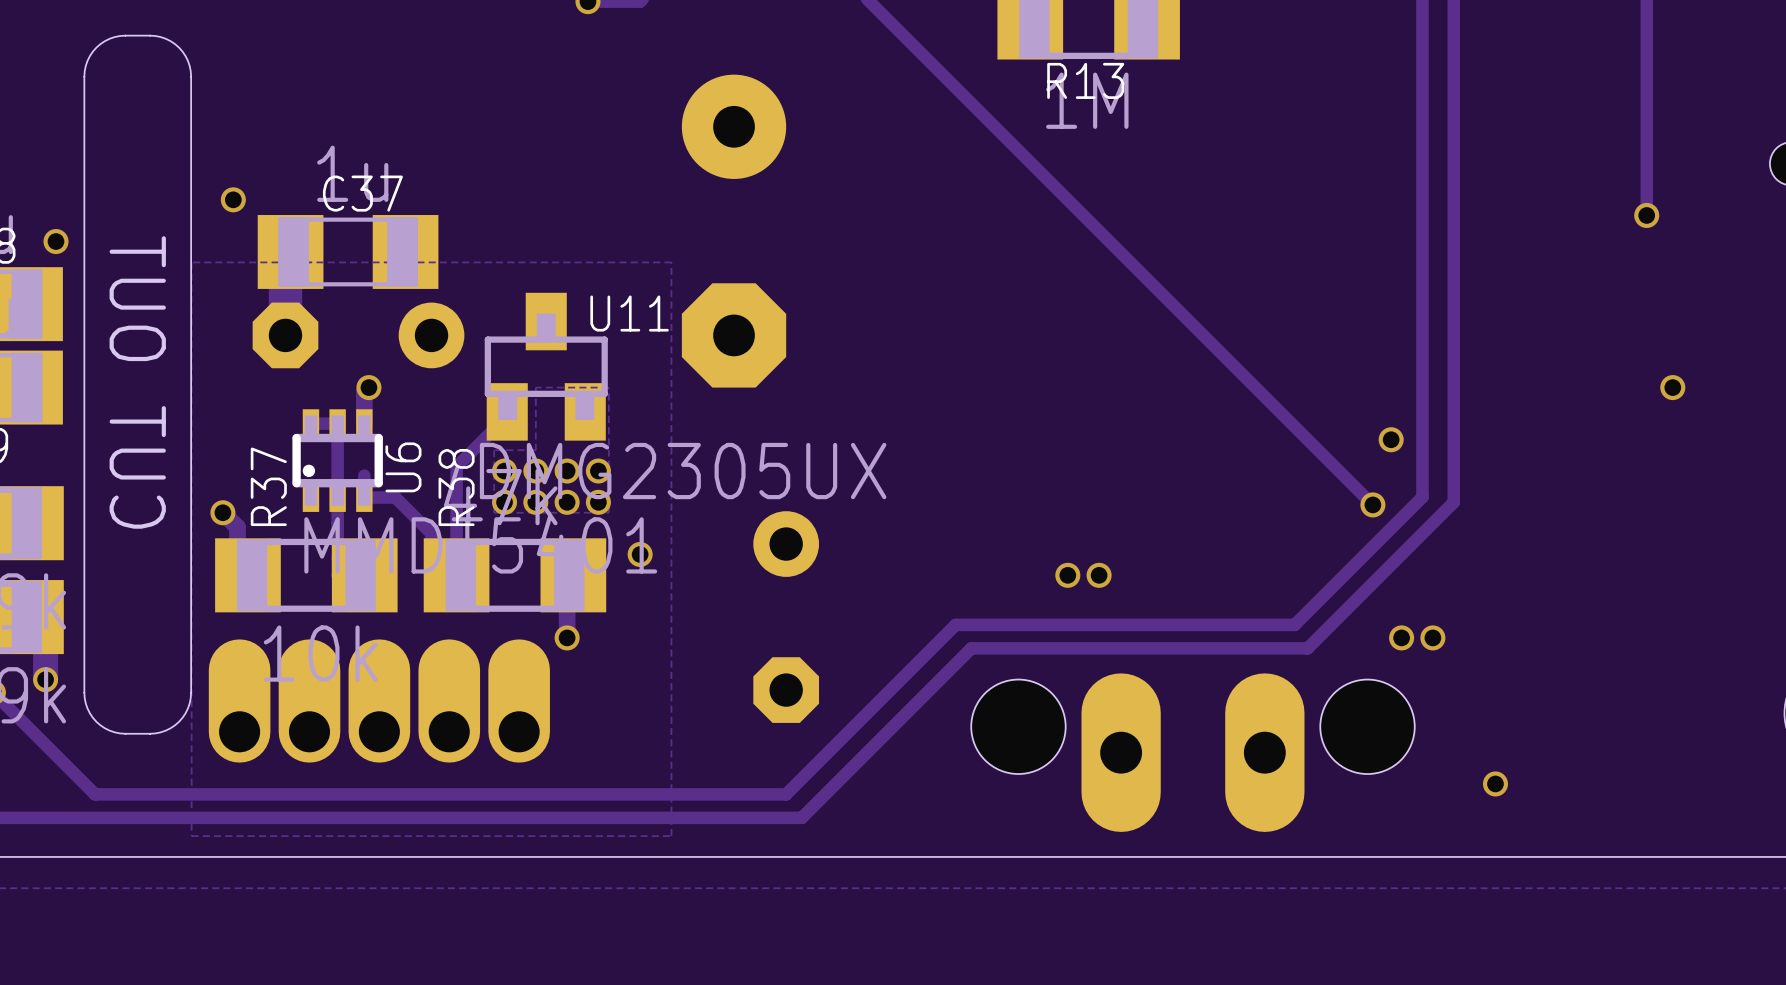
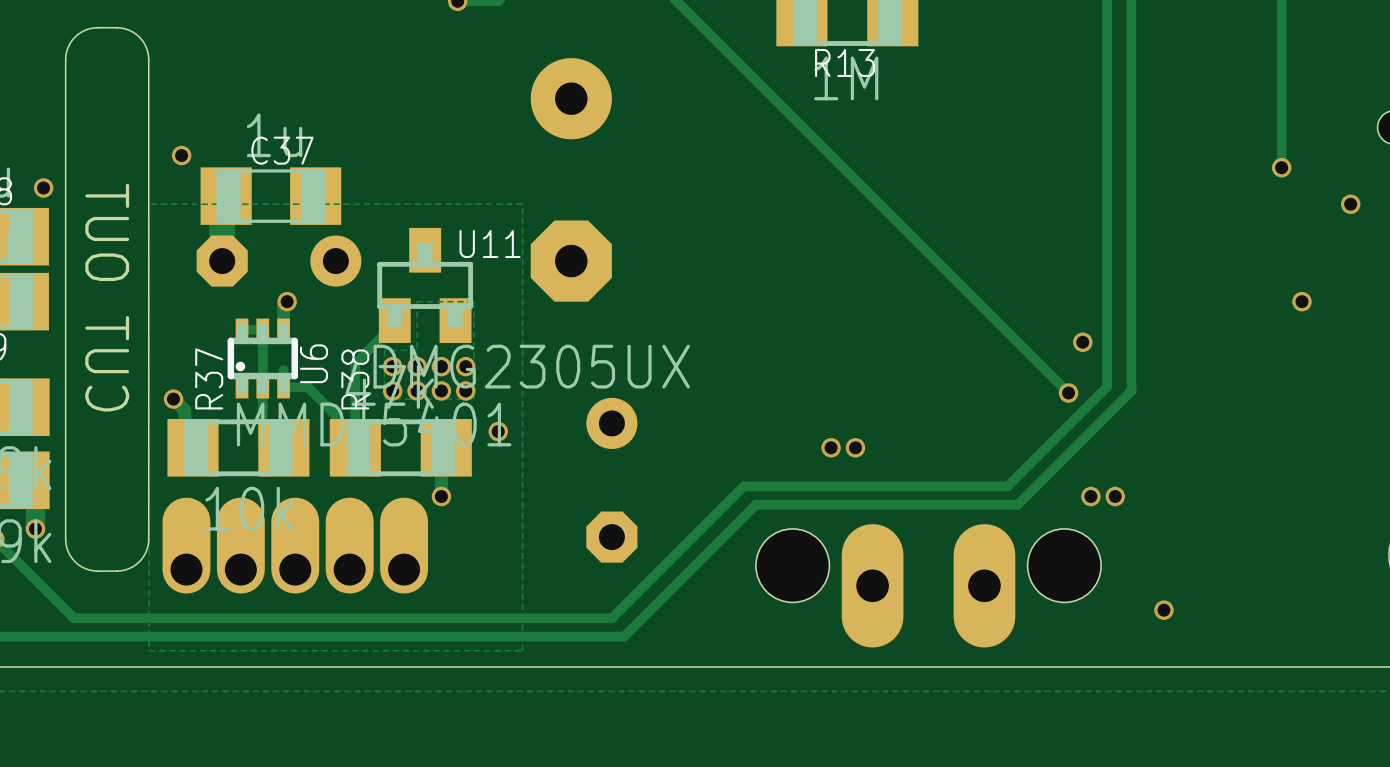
via: none -> (1350, 204)

